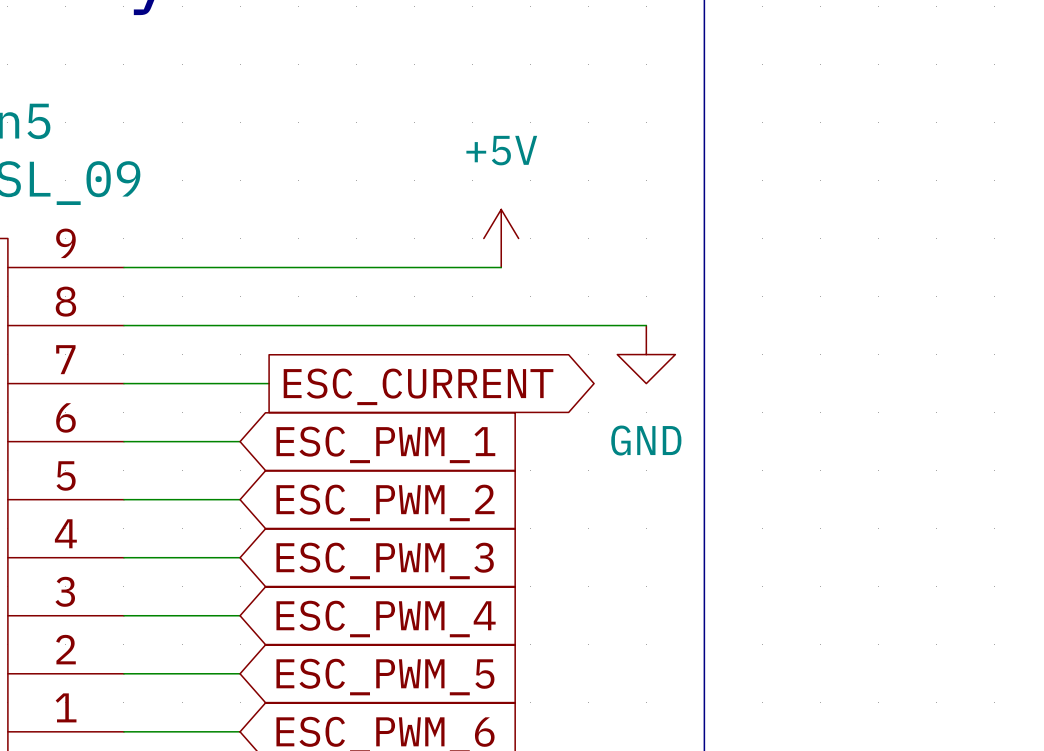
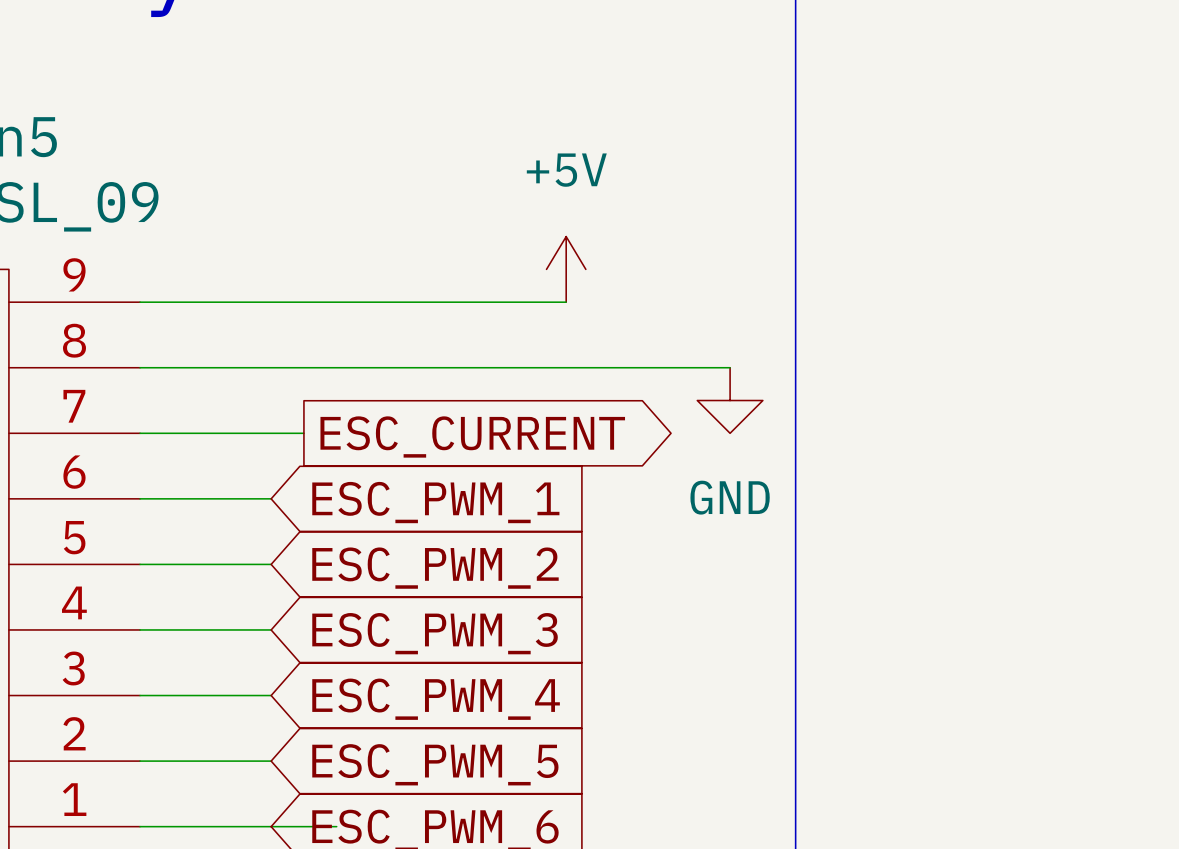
wire: none -> (271, 826) (336, 826)

